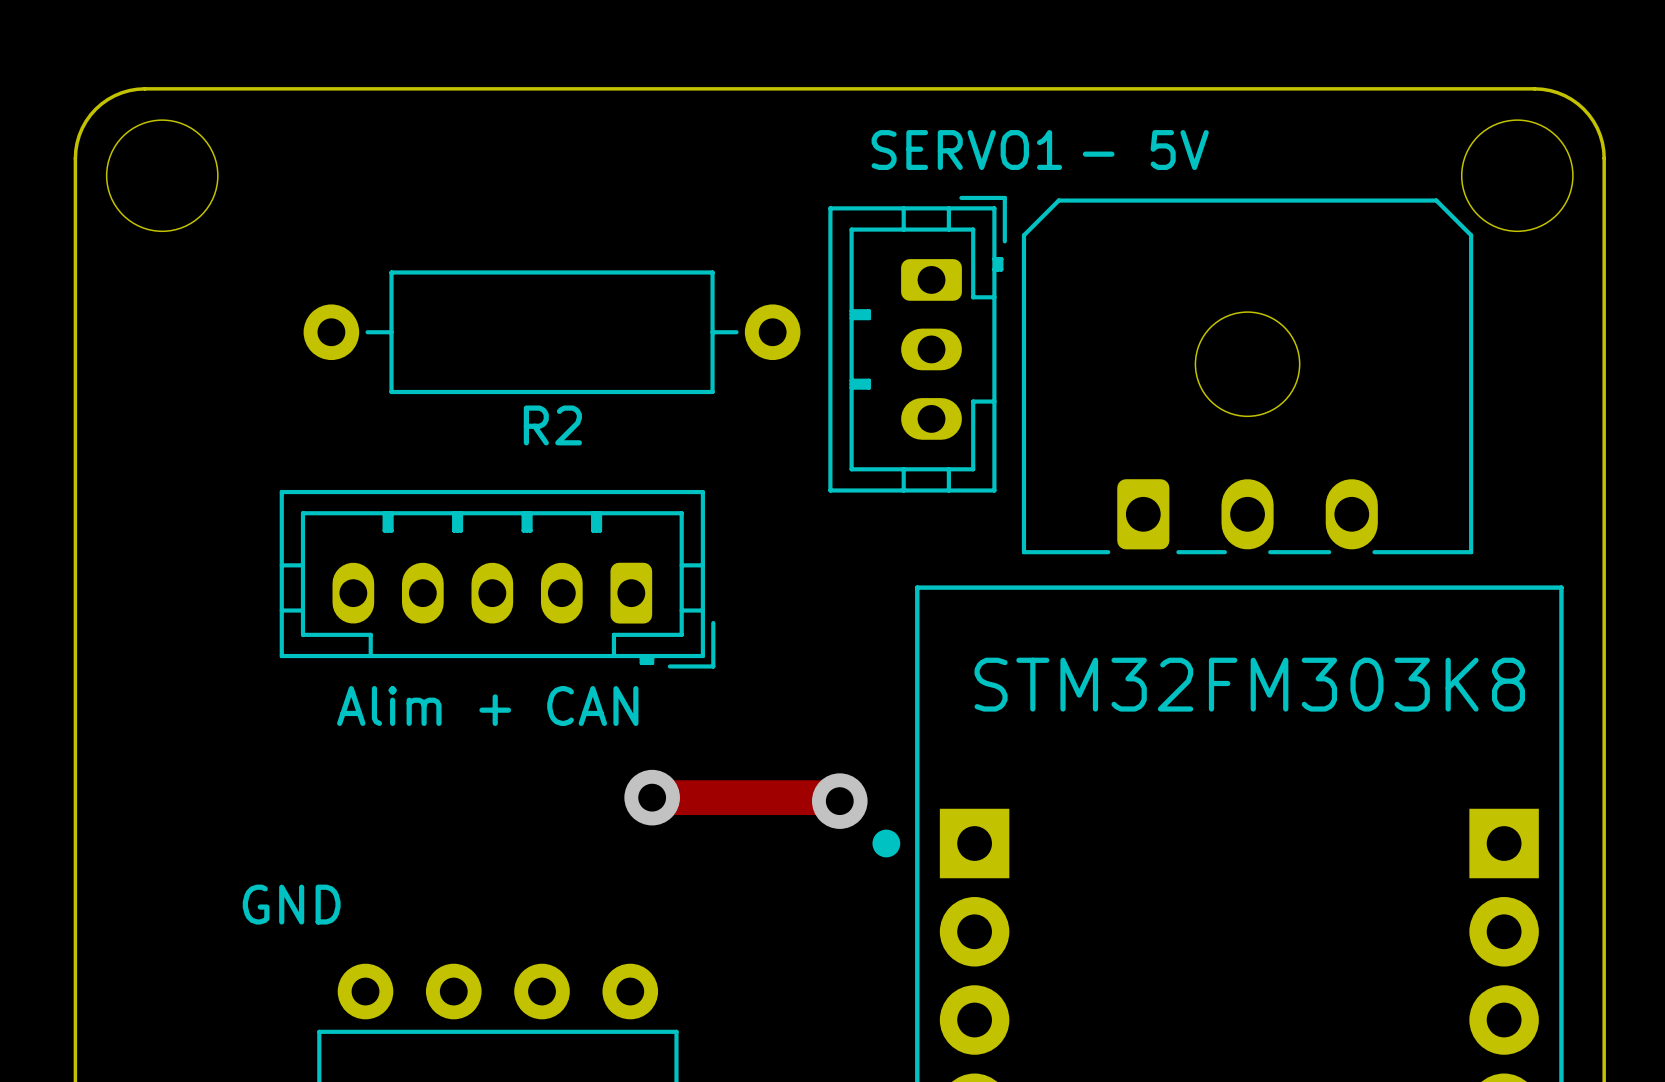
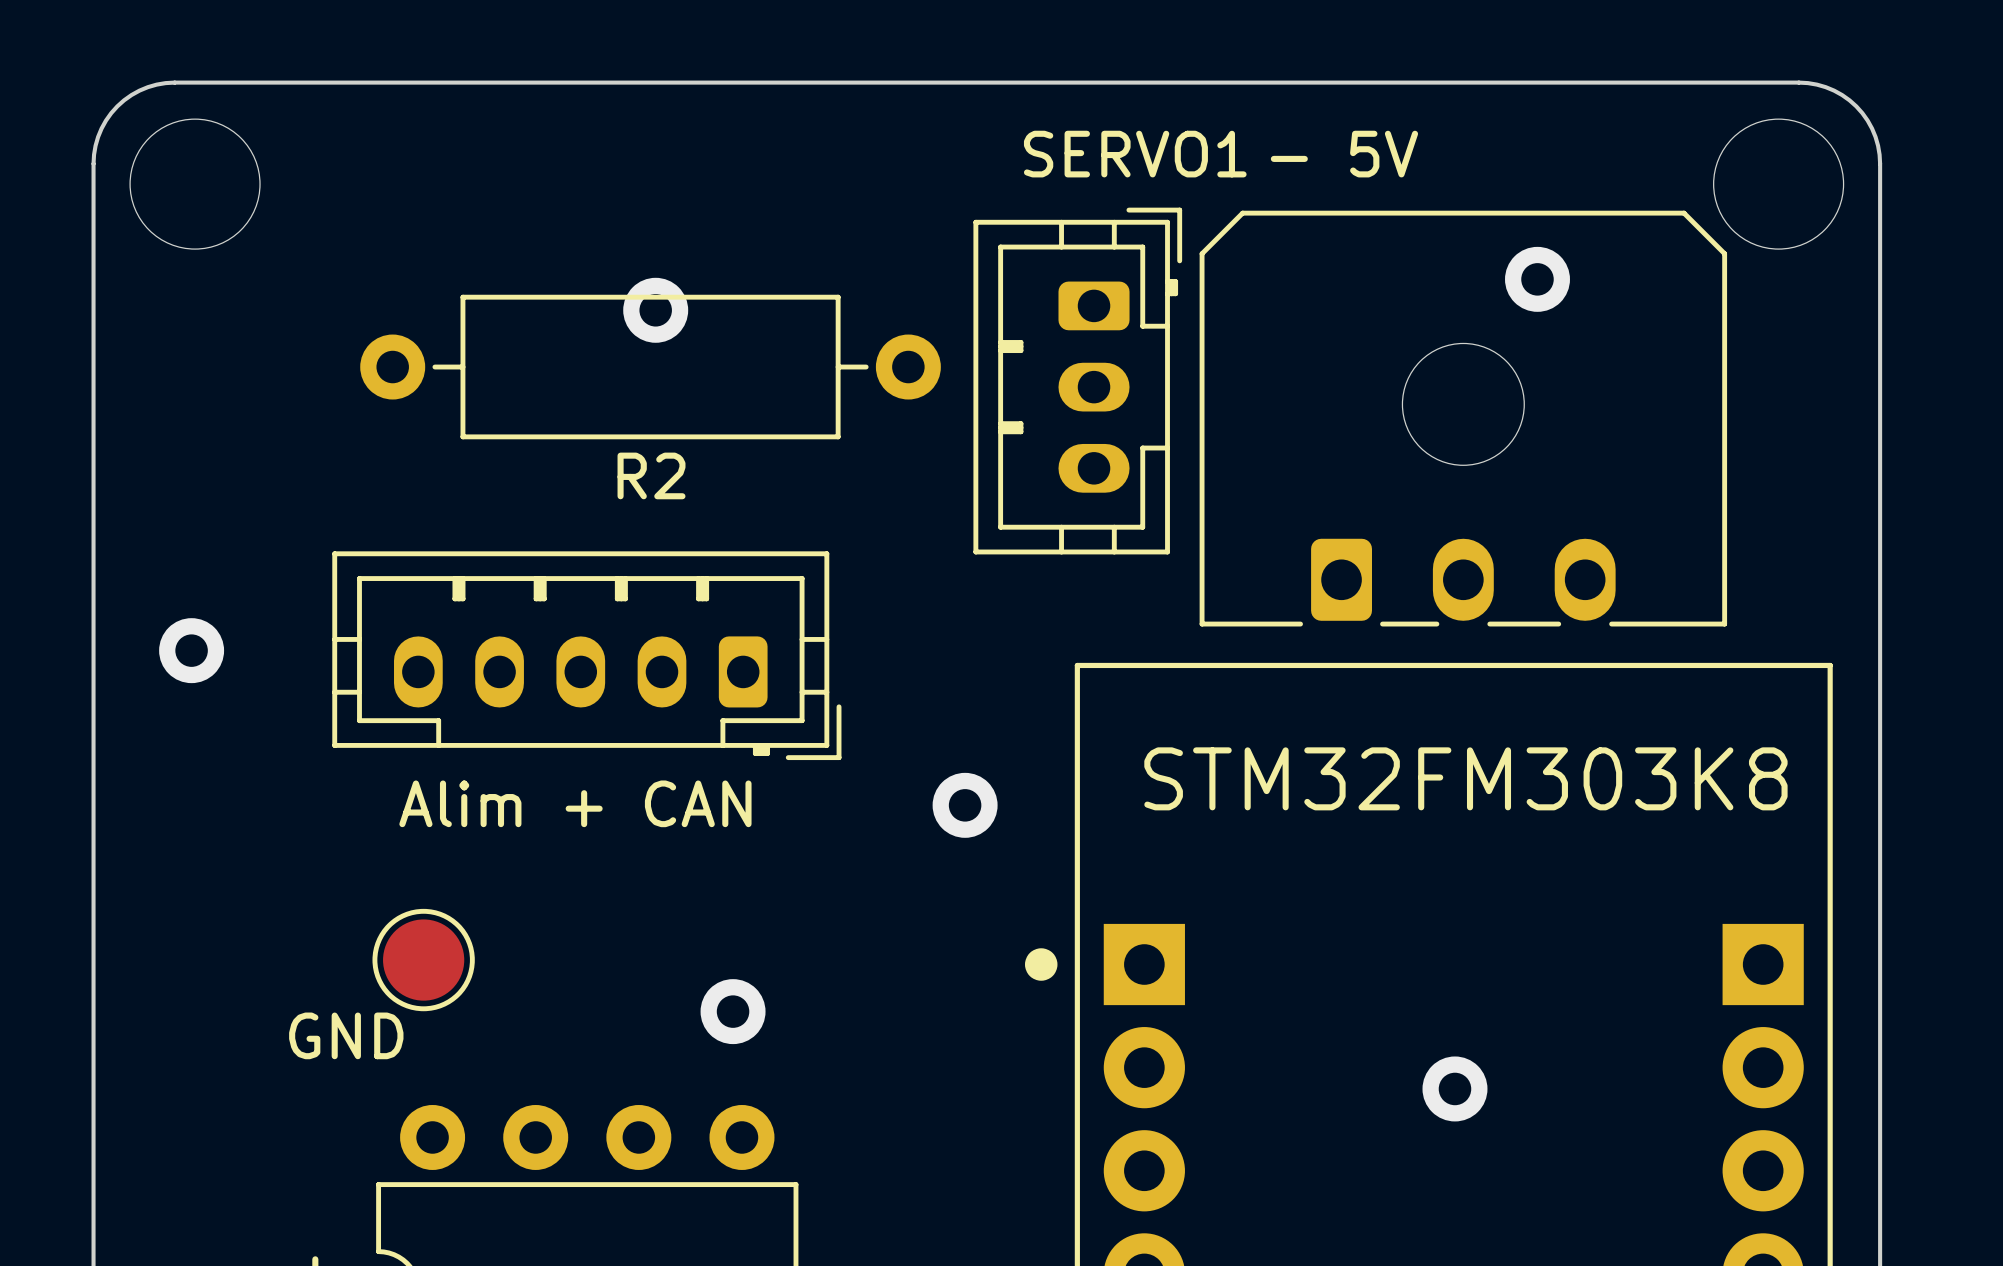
via: none -> (1537, 279)
via: none -> (655, 310)
via: none -> (191, 650)
via: none -> (965, 805)
track: (652, 797) (836, 797) (839, 801) -> none
via position: (652, 797) -> (733, 1011)
via: (839, 801) -> none
part: none -> (423, 960)
via: none -> (1454, 1088)

